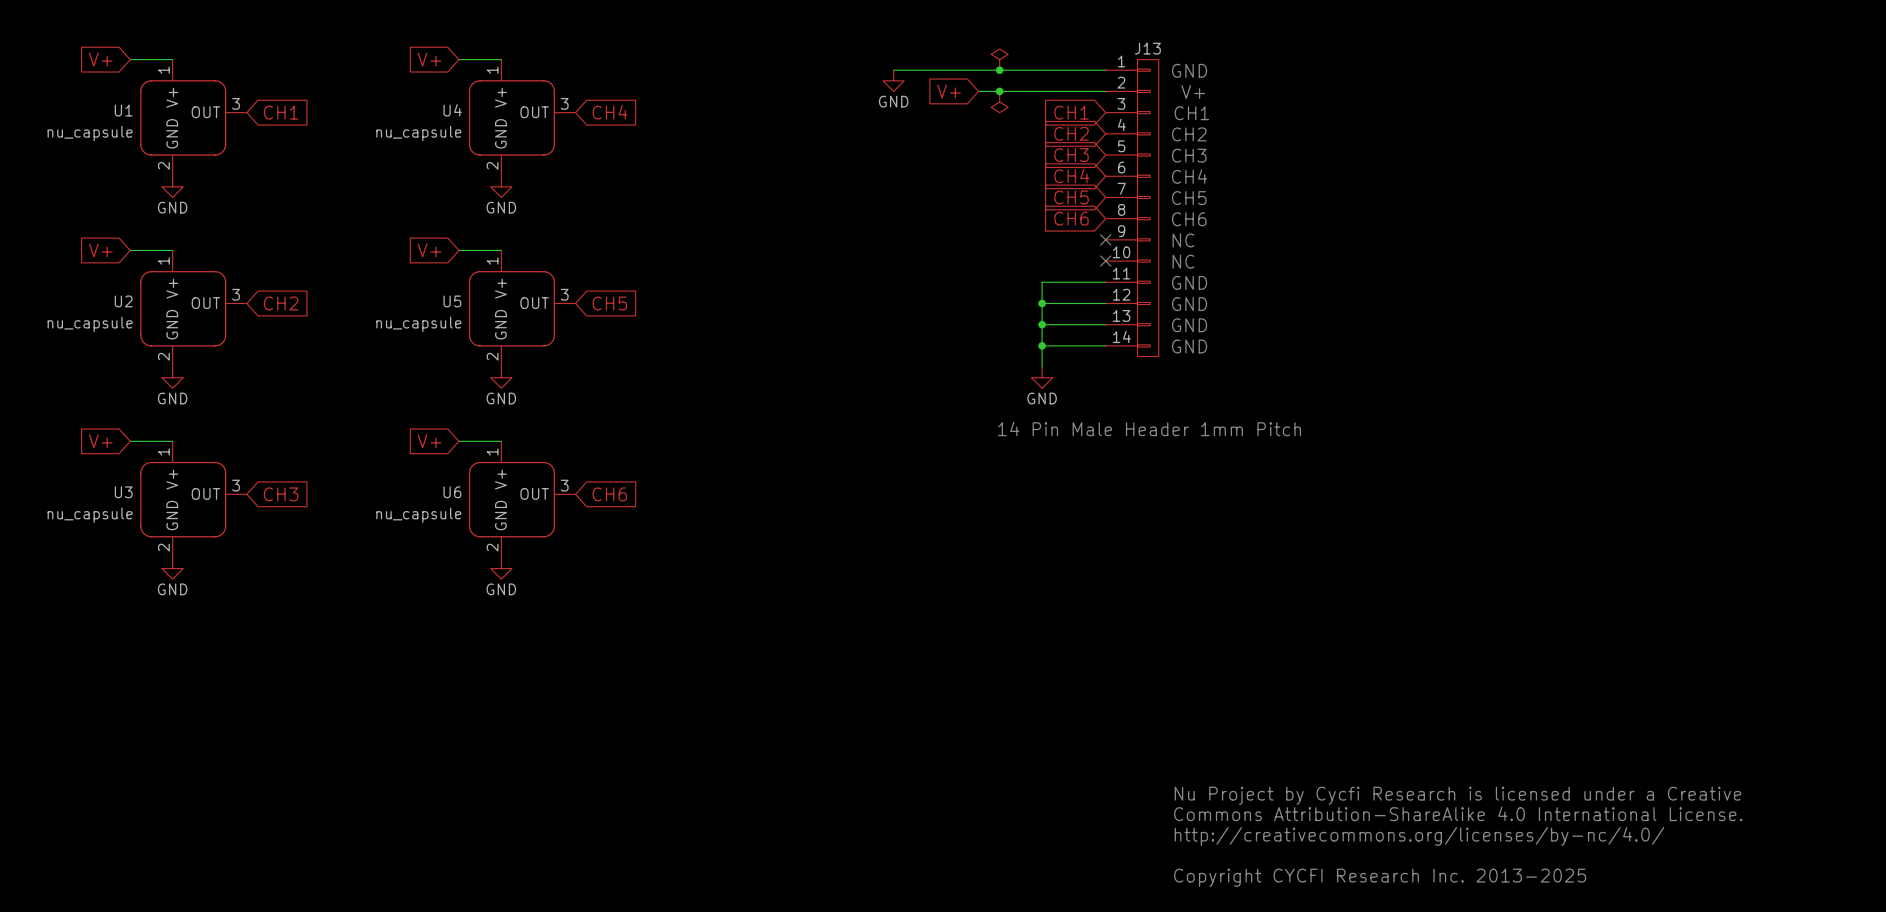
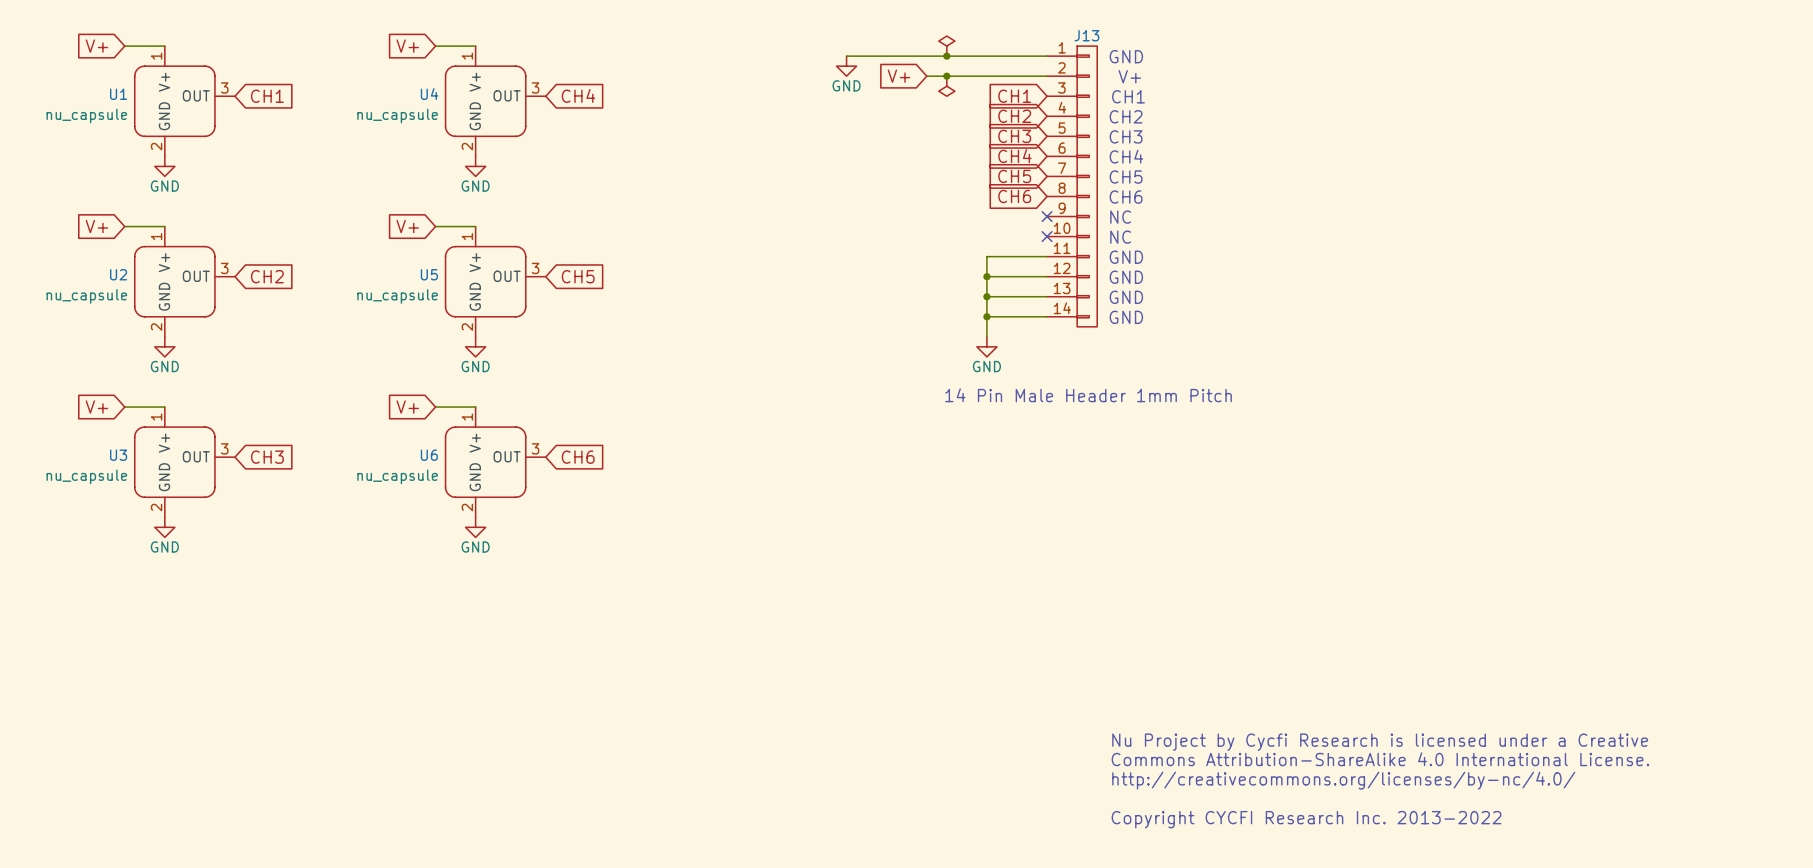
text: Copyright CYCFI Research Inc. 2013-2025 (1380, 877) -> Copyright CYCFI Research Inc. 2013-2022 (1306, 819)

